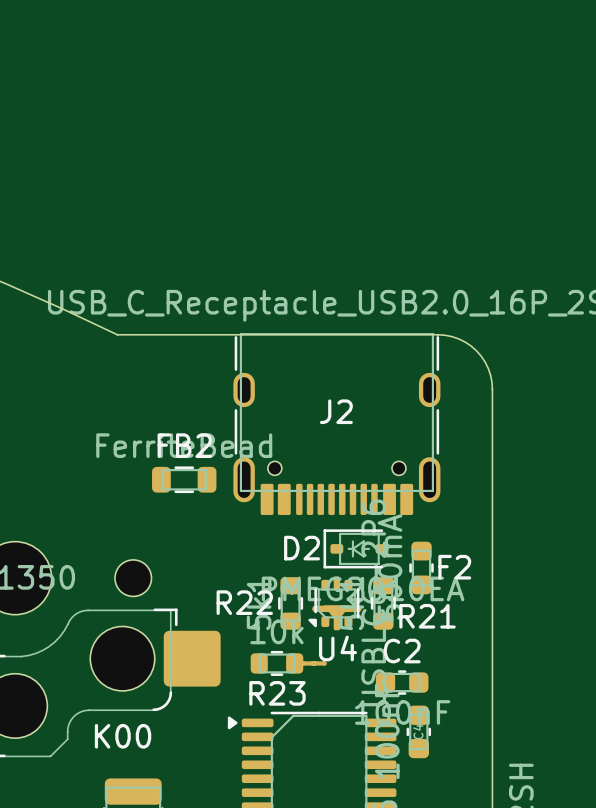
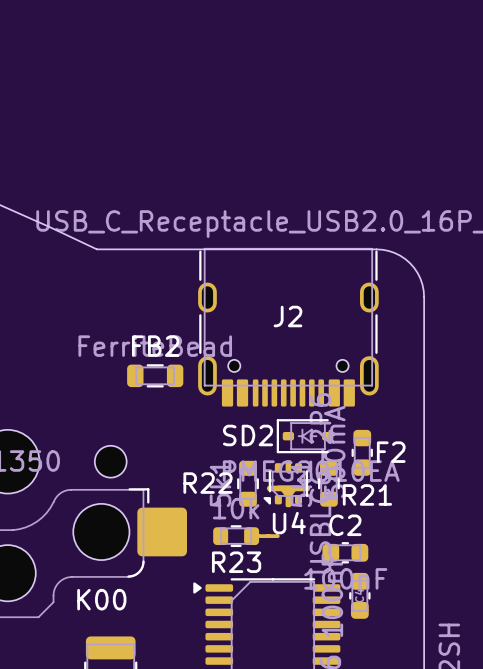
D2 name: D2 (302, 548) -> SD2 (248, 435)

